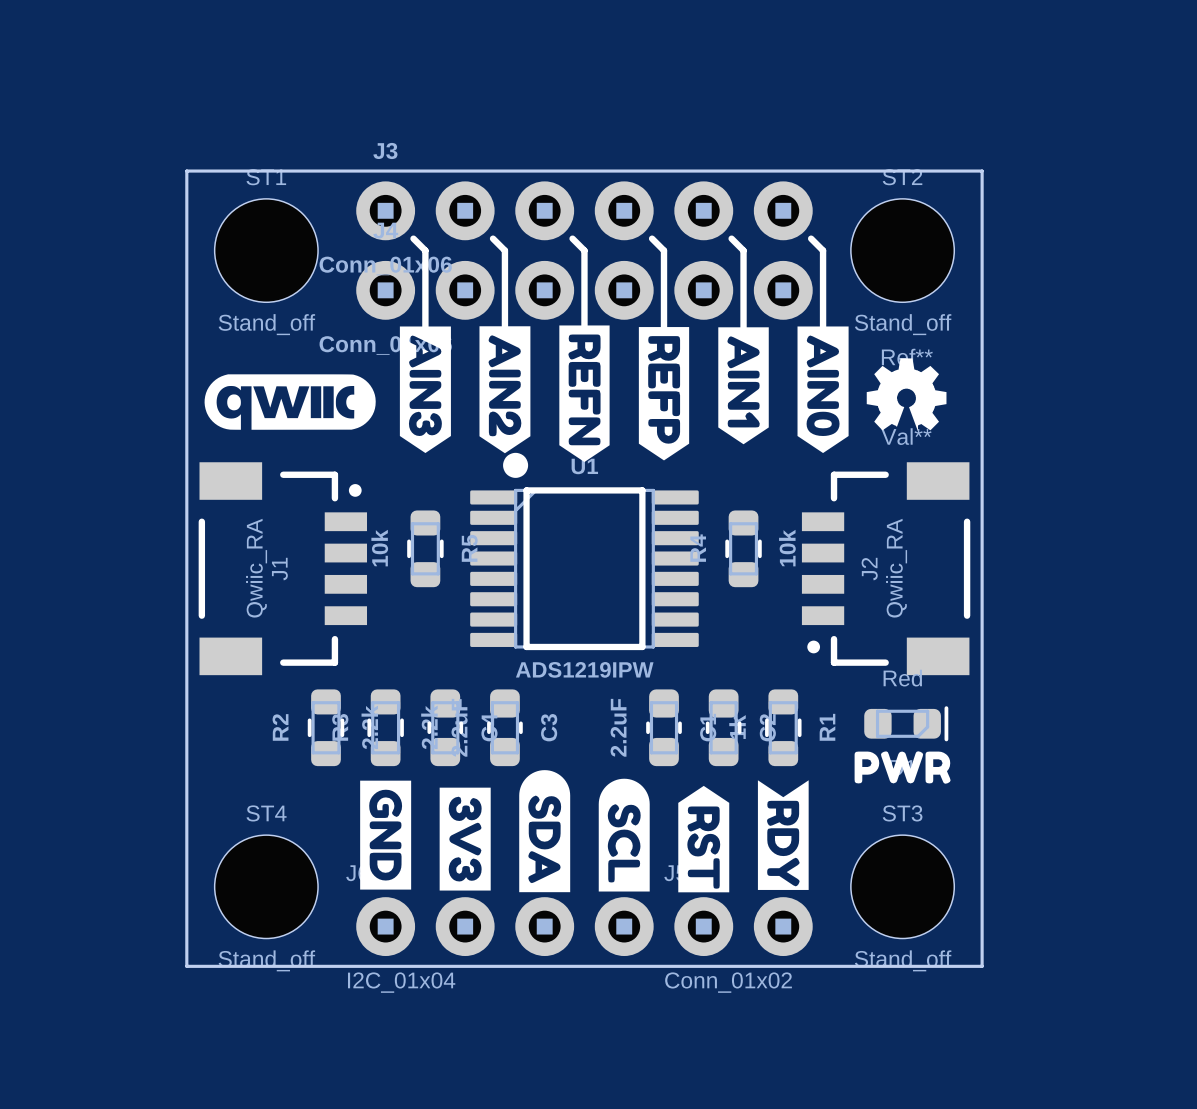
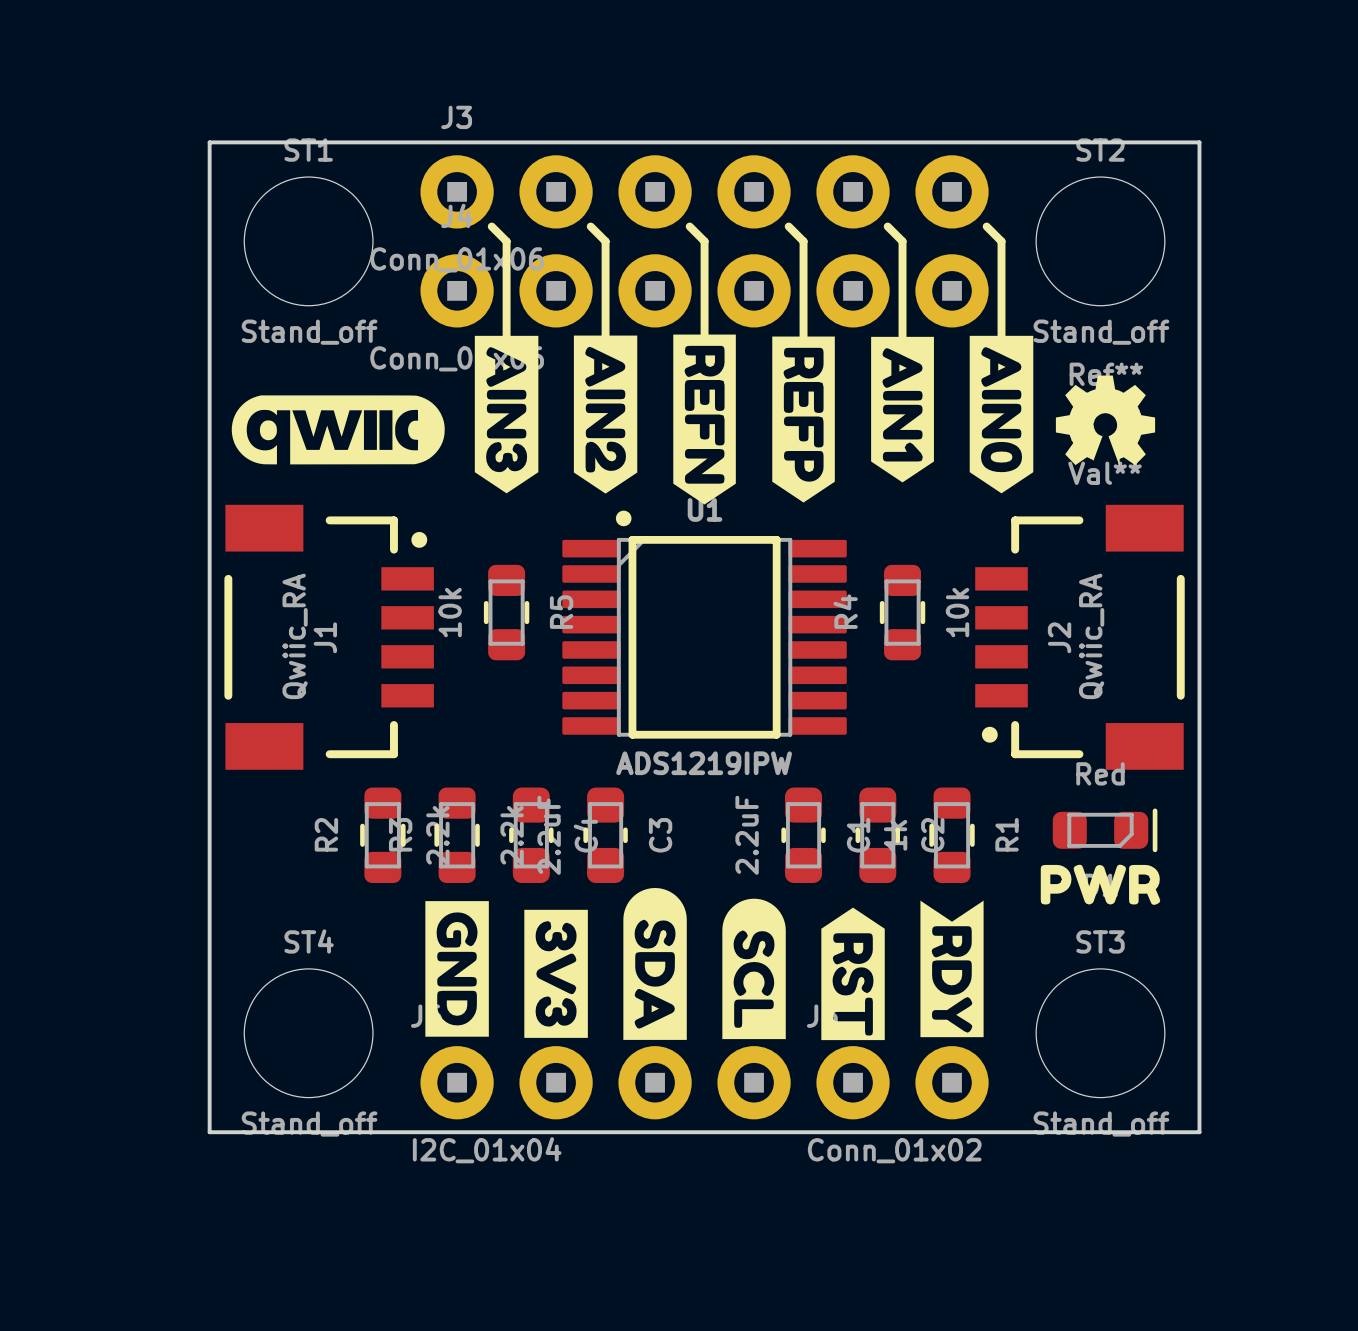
U1 footprint: [470, 452, 699, 651] -> [562, 510, 847, 739]

